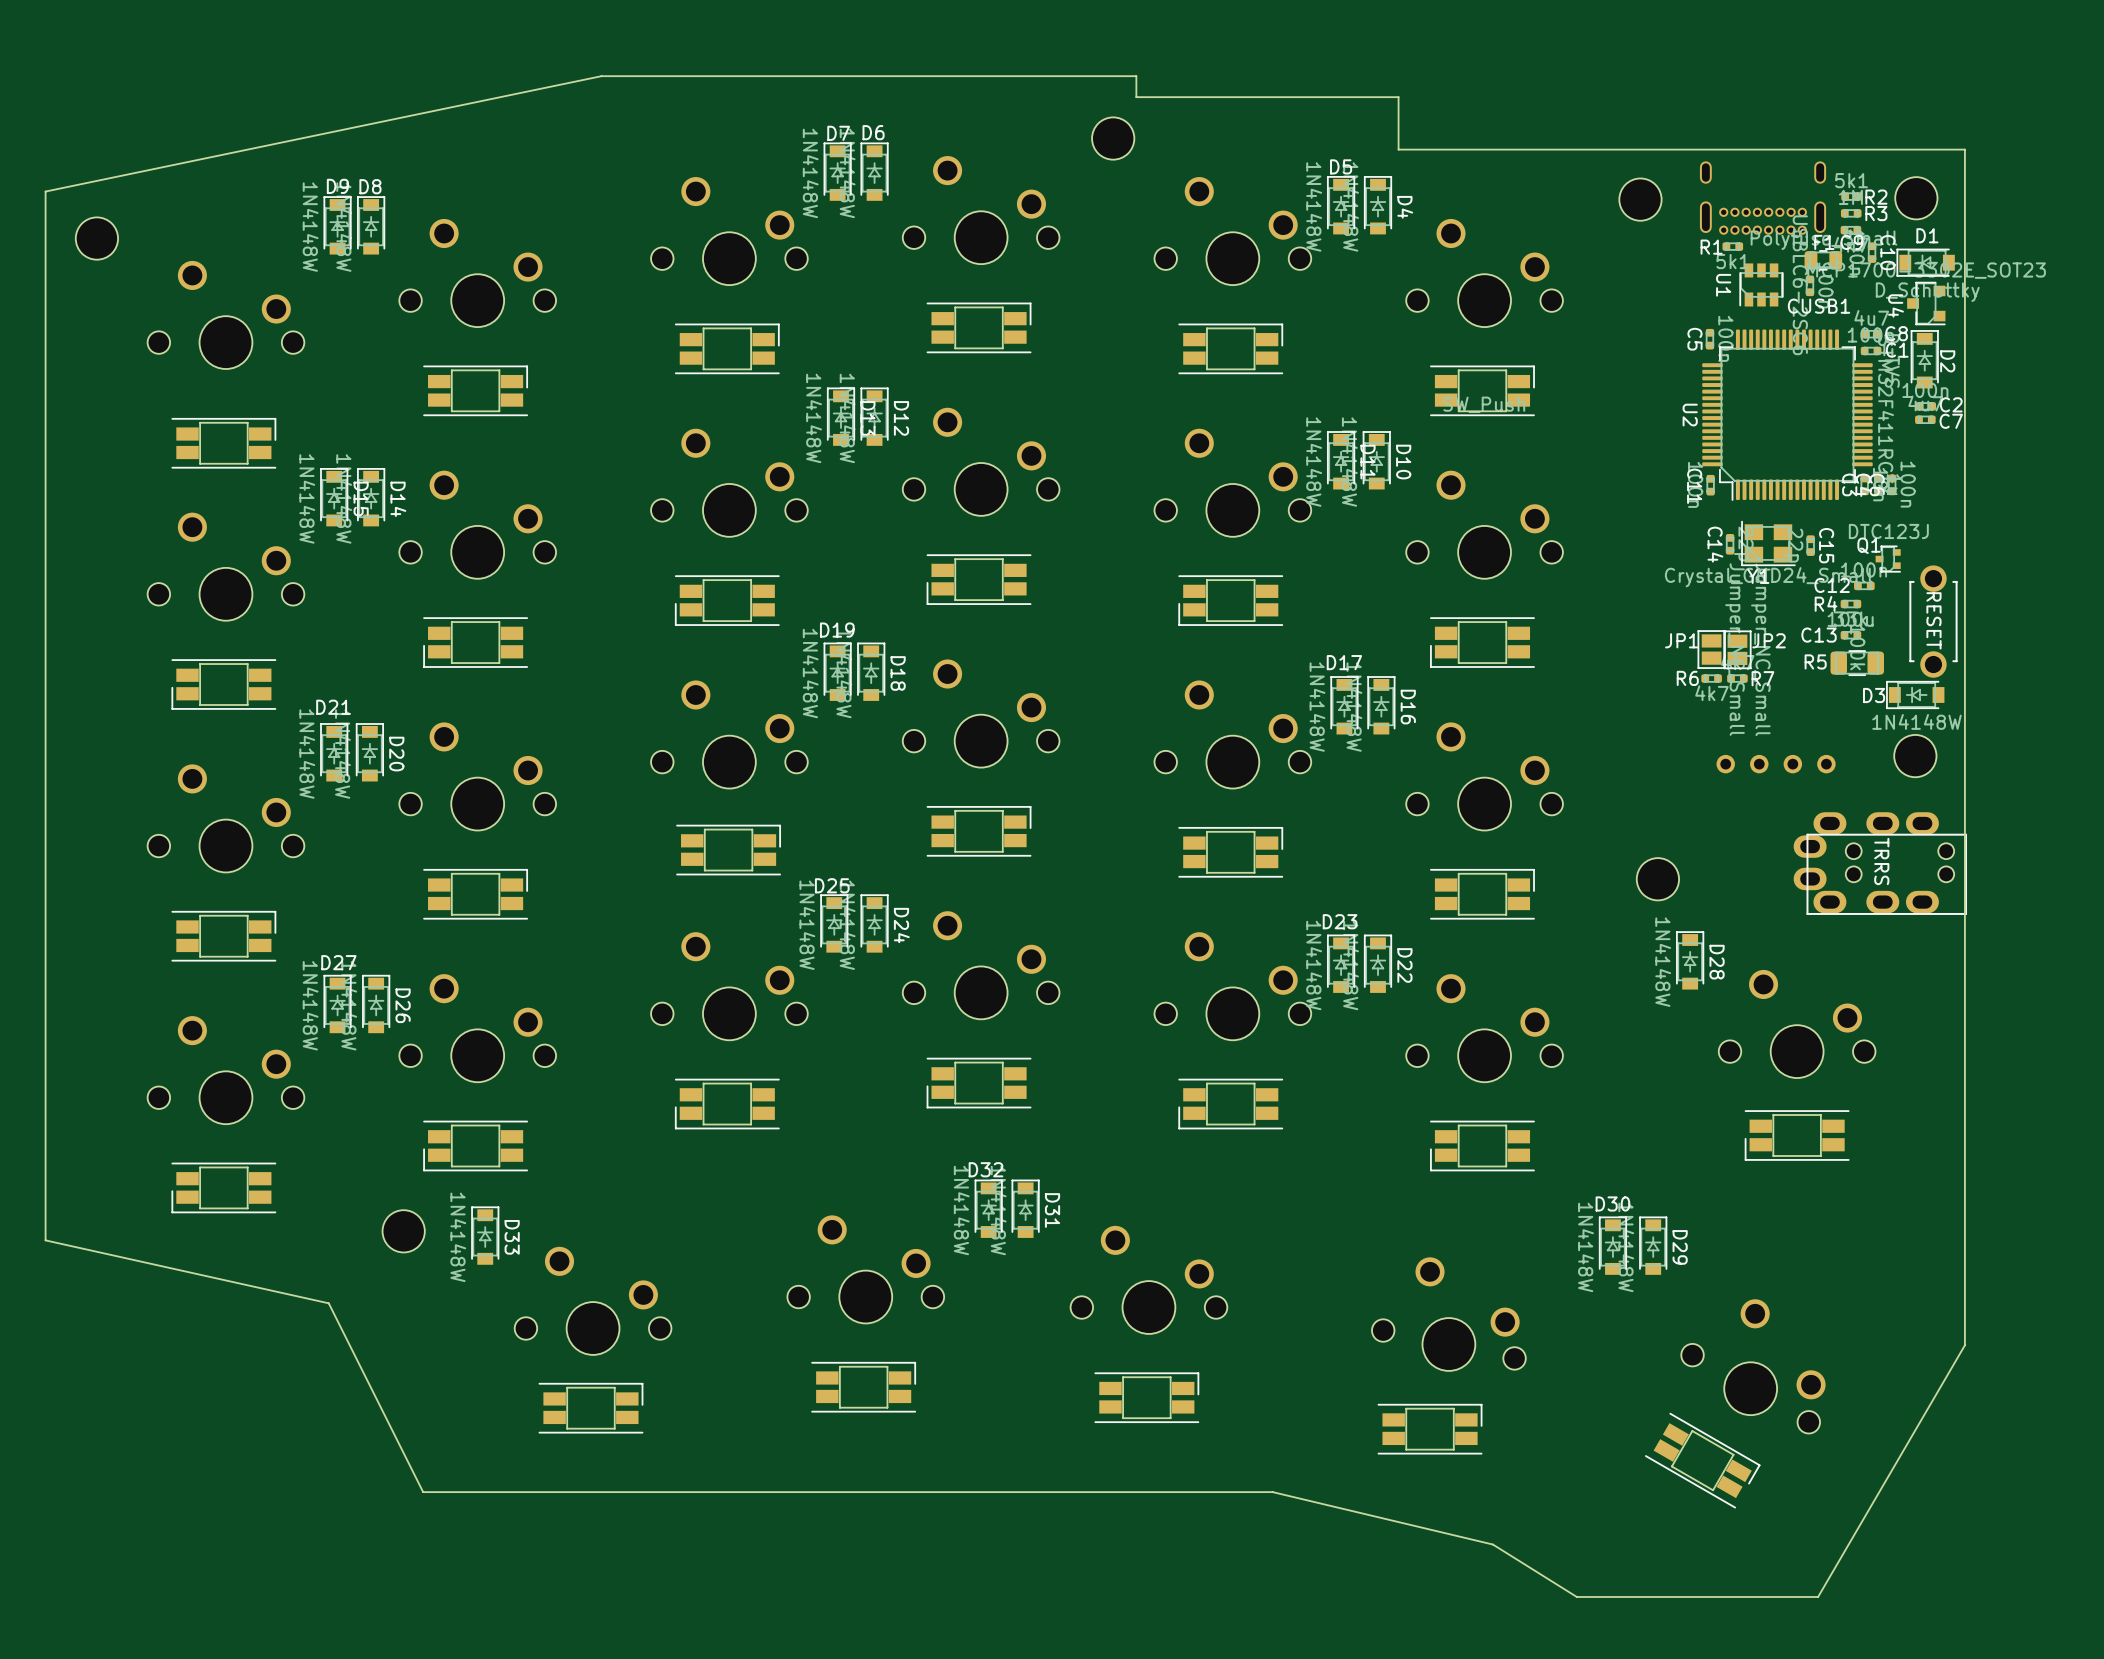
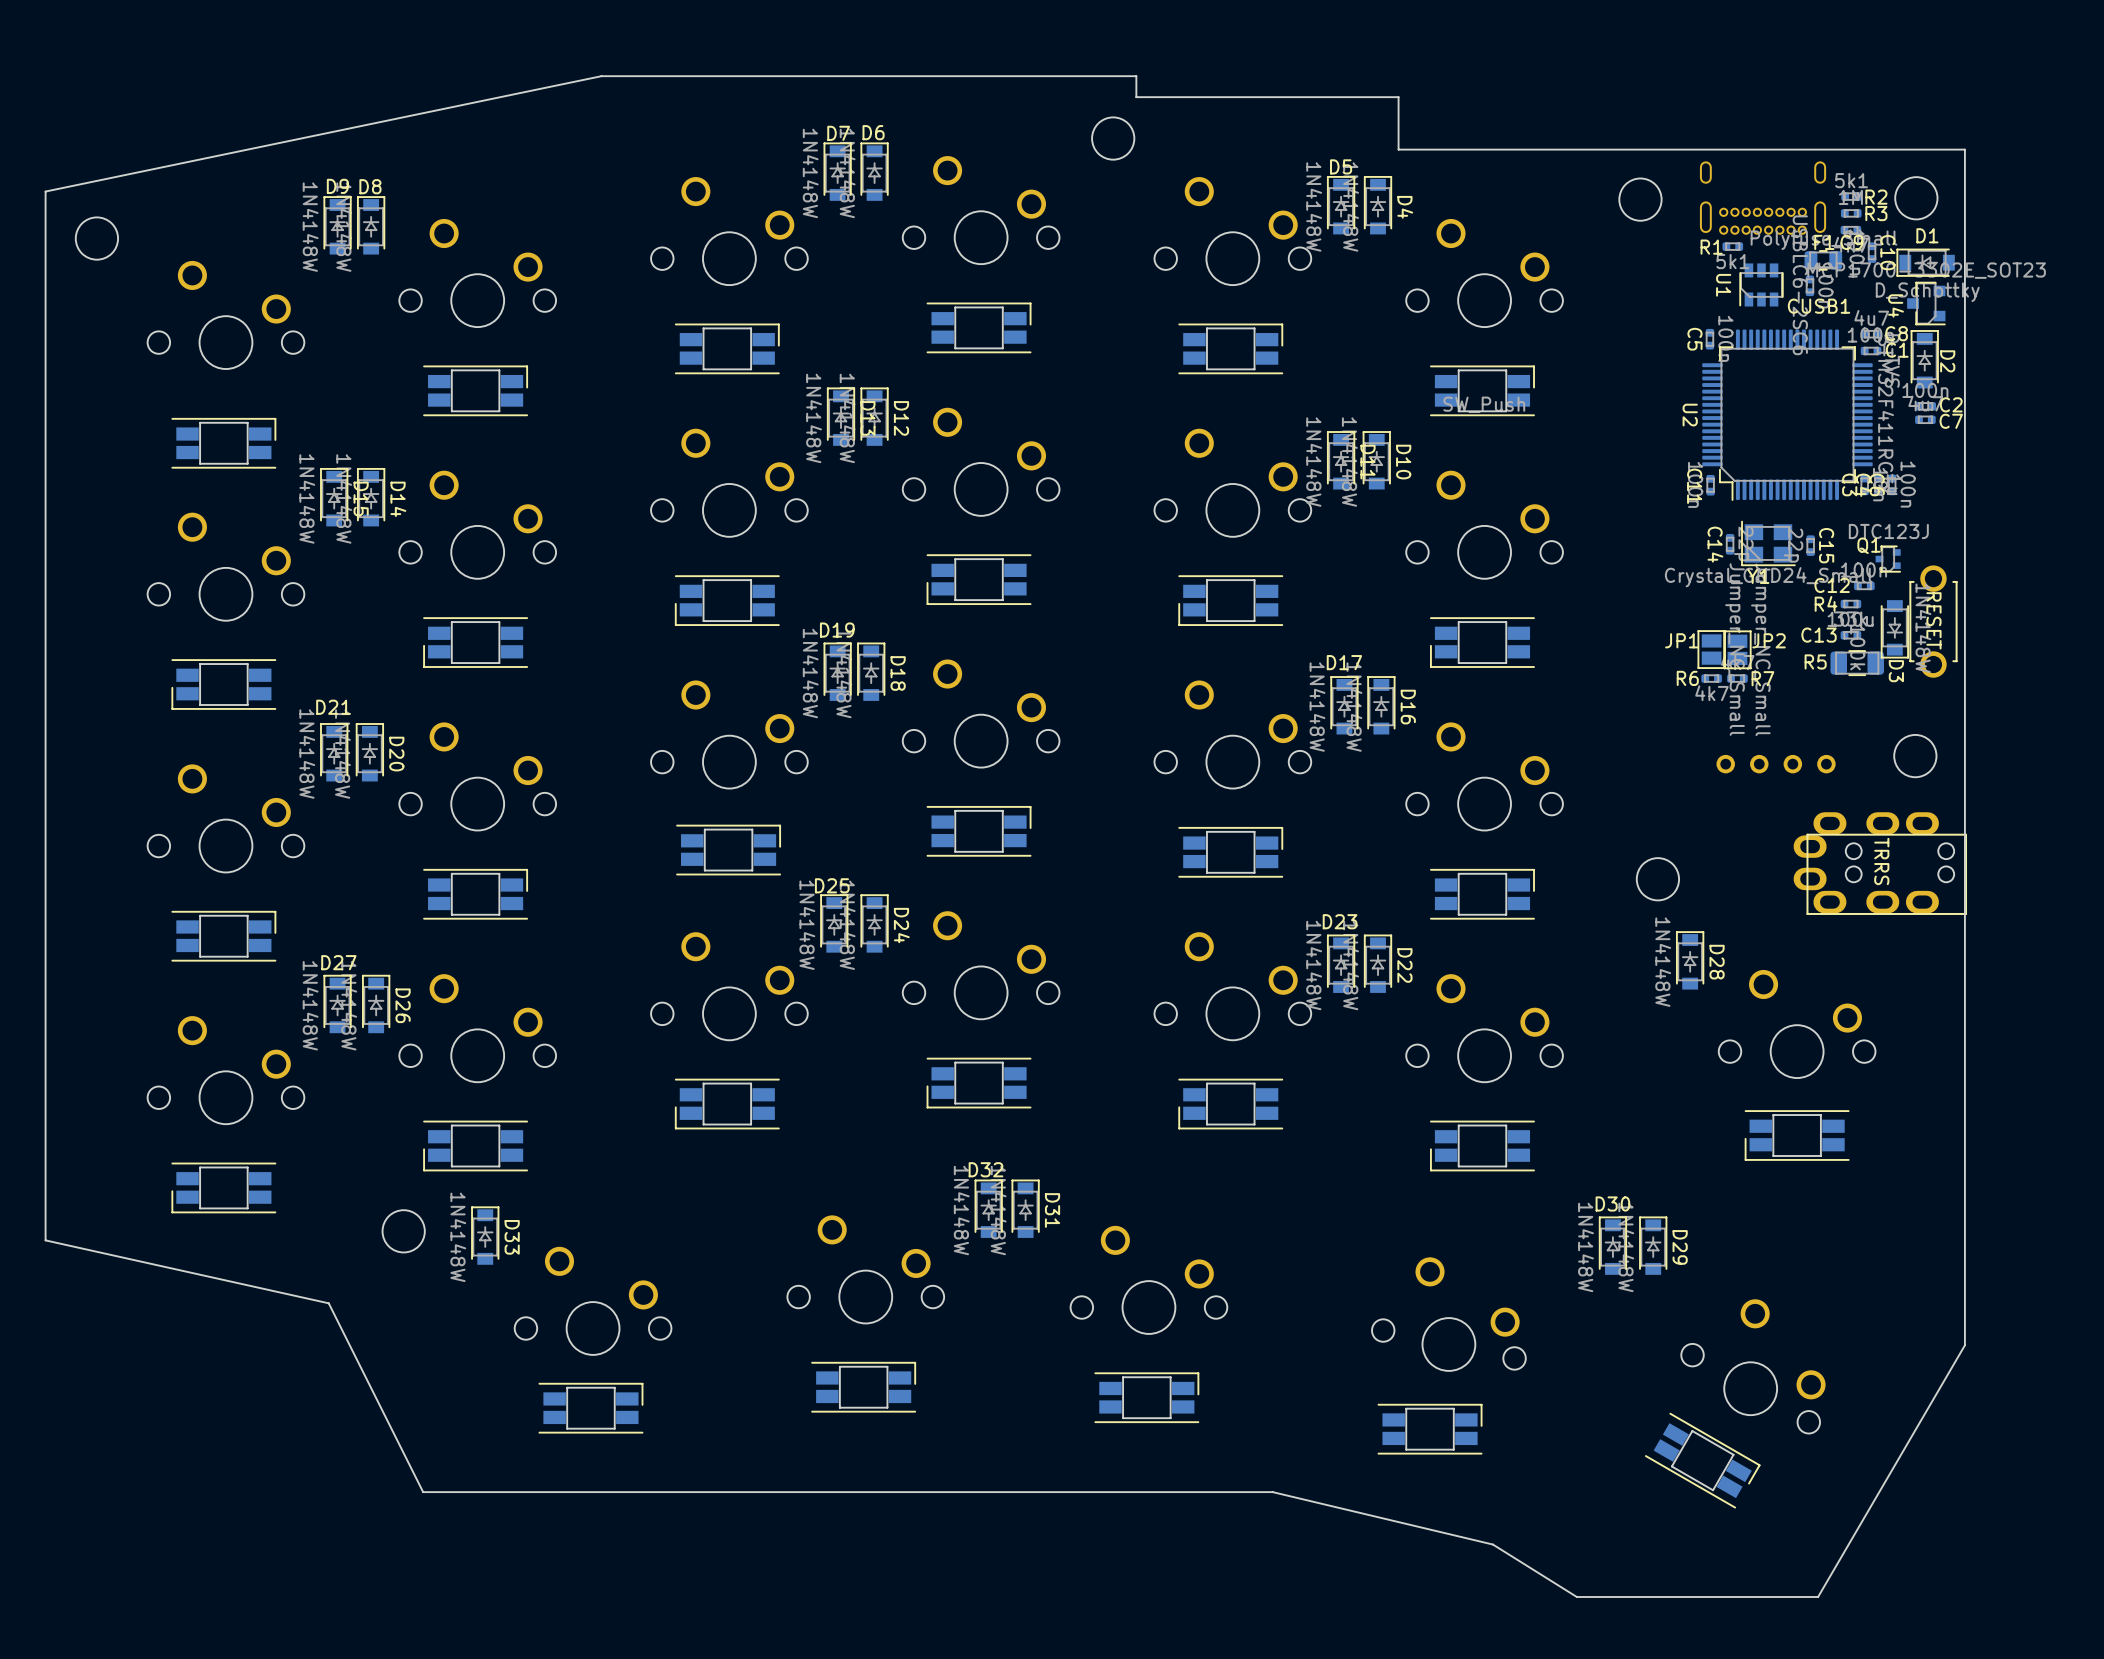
D3 rotation: 0° (1915, 694) -> 90° counterclockwise (1894, 629)
D3 position: (1915, 694) -> (1894, 629)

